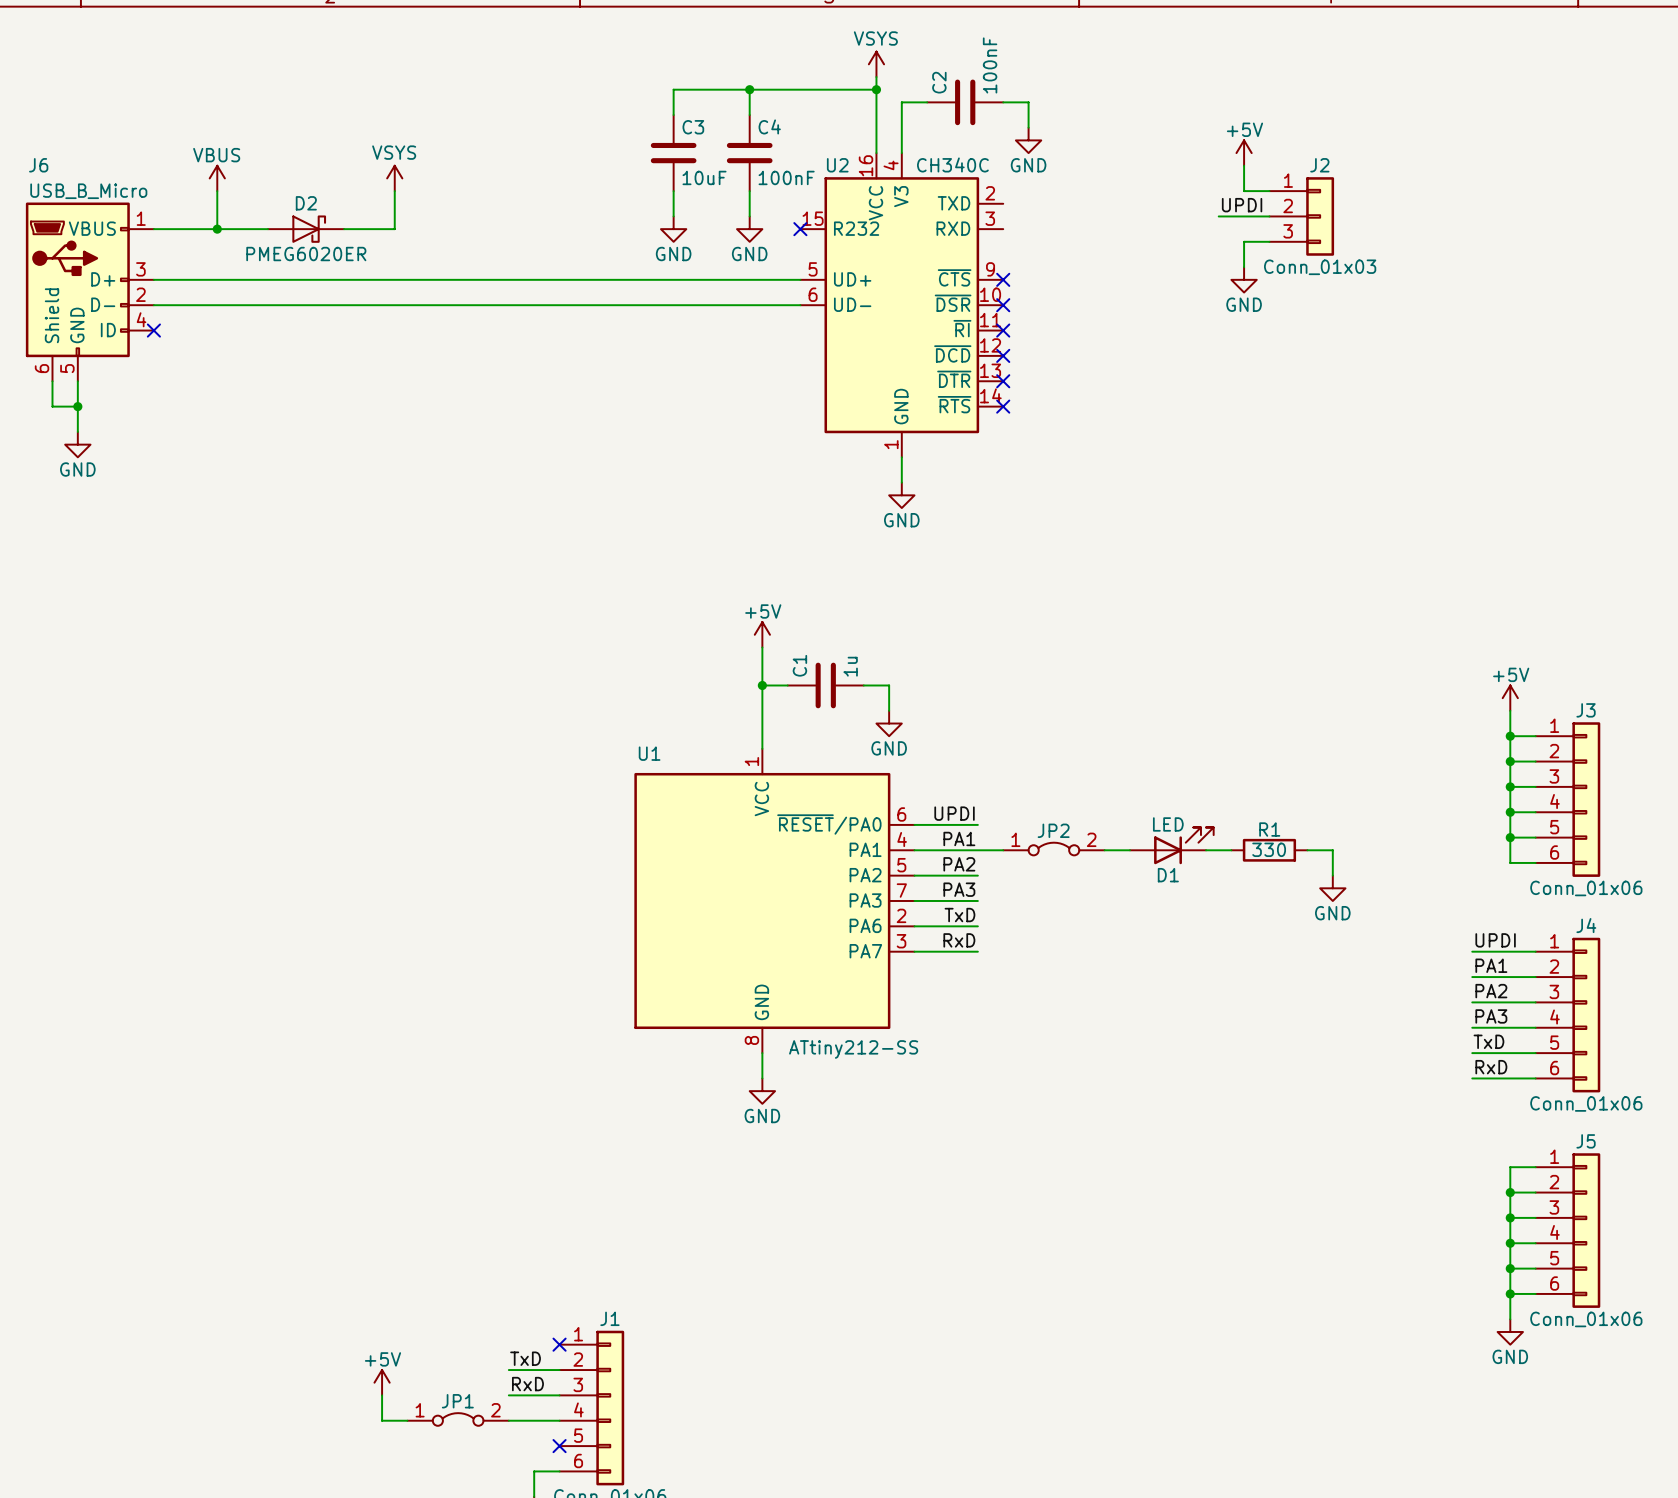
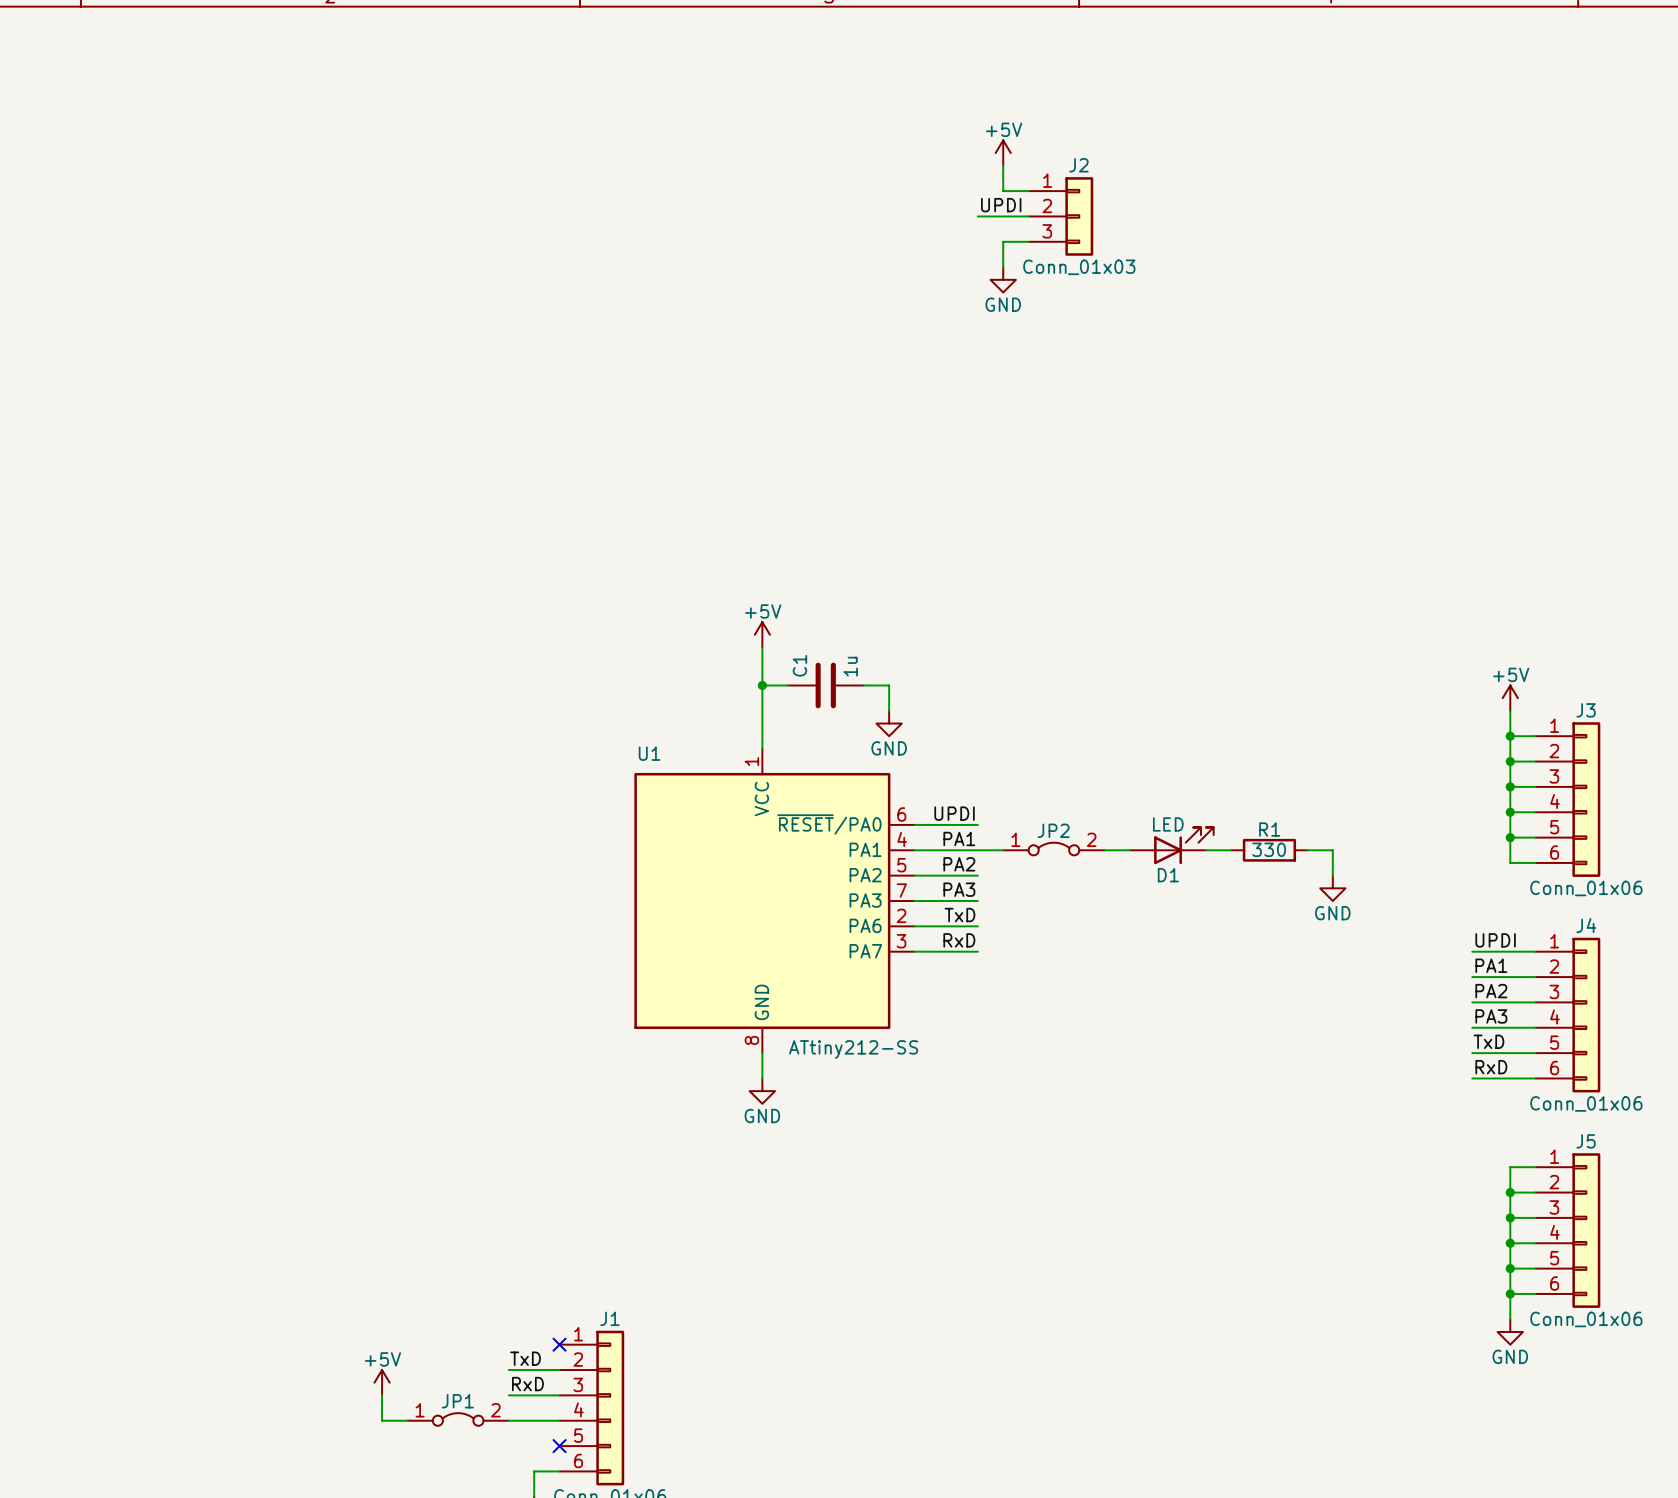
power symbol: VSYS (876, 64) -> none
wire: (876, 77) (876, 153) -> none
wire: (749, 89) (749, 115) -> none
junction: (749, 89) -> none
wire: (876, 89) (673, 89) (673, 115) -> none
junction: (876, 89) -> none
wire: (927, 102) (901, 102) (901, 153) -> none
C2: 100nF (965, 102) -> none
wire: (1003, 102) (1028, 102) (1028, 127) -> none
power symbol: GND (1028, 140) -> none
C3: 10uF (673, 153) -> none
C4: 100nF (749, 153) -> none
power symbol position: +5V (1244, 153) -> +5V (1003, 153)
wire: (1244, 165) (1244, 191) (1269, 191) -> (1003, 165) (1003, 191) (1028, 191)
power symbol: VBUS (217, 178) -> none
power symbol: VSYS (394, 178) -> none
wire: (217, 191) (217, 229) -> none
wire: (394, 191) (394, 229) (344, 229) -> none
wire: (673, 191) (673, 216) -> none
wire: (749, 191) (749, 216) -> none
label position: UPDI (1242, 205) -> UPDI (1001, 205)
wire: (1218, 216) (1269, 216) -> (977, 216) (1028, 216)
J2 position: (1301, 216) -> (1060, 216)
wire: (153, 229) (267, 229) -> none
junction: (217, 229) -> none
D2: PMEG6020ER (306, 229) -> none
power symbol: GND (673, 229) -> none
power symbol: GND (749, 229) -> none
no-connect mark: (800, 229) -> none
wire: (1269, 241) (1244, 241) (1244, 267) -> (1028, 241) (1003, 241) (1003, 267)
wire: (153, 279) (800, 279) -> none
no-connect mark: (1003, 279) -> none
power symbol: none -> GND (1003, 279)
power symbol: GND (1244, 279) -> none
J6: USB_B_Micro (89, 291) -> none
wire: (153, 305) (800, 305) -> none
U2: CH340C (901, 305) -> none
no-connect mark: (1003, 305) -> none
no-connect mark: (153, 330) -> none
no-connect mark: (1003, 330) -> none
no-connect mark: (1003, 355) -> none
wire: (52, 381) (52, 406) (77, 406) -> none
wire: (77, 381) (77, 431) -> none
no-connect mark: (1003, 381) -> none
junction: (77, 406) -> none
no-connect mark: (1003, 406) -> none
power symbol: GND (77, 444) -> none
wire: (901, 457) (901, 482) -> none
power symbol: GND (901, 495) -> none

